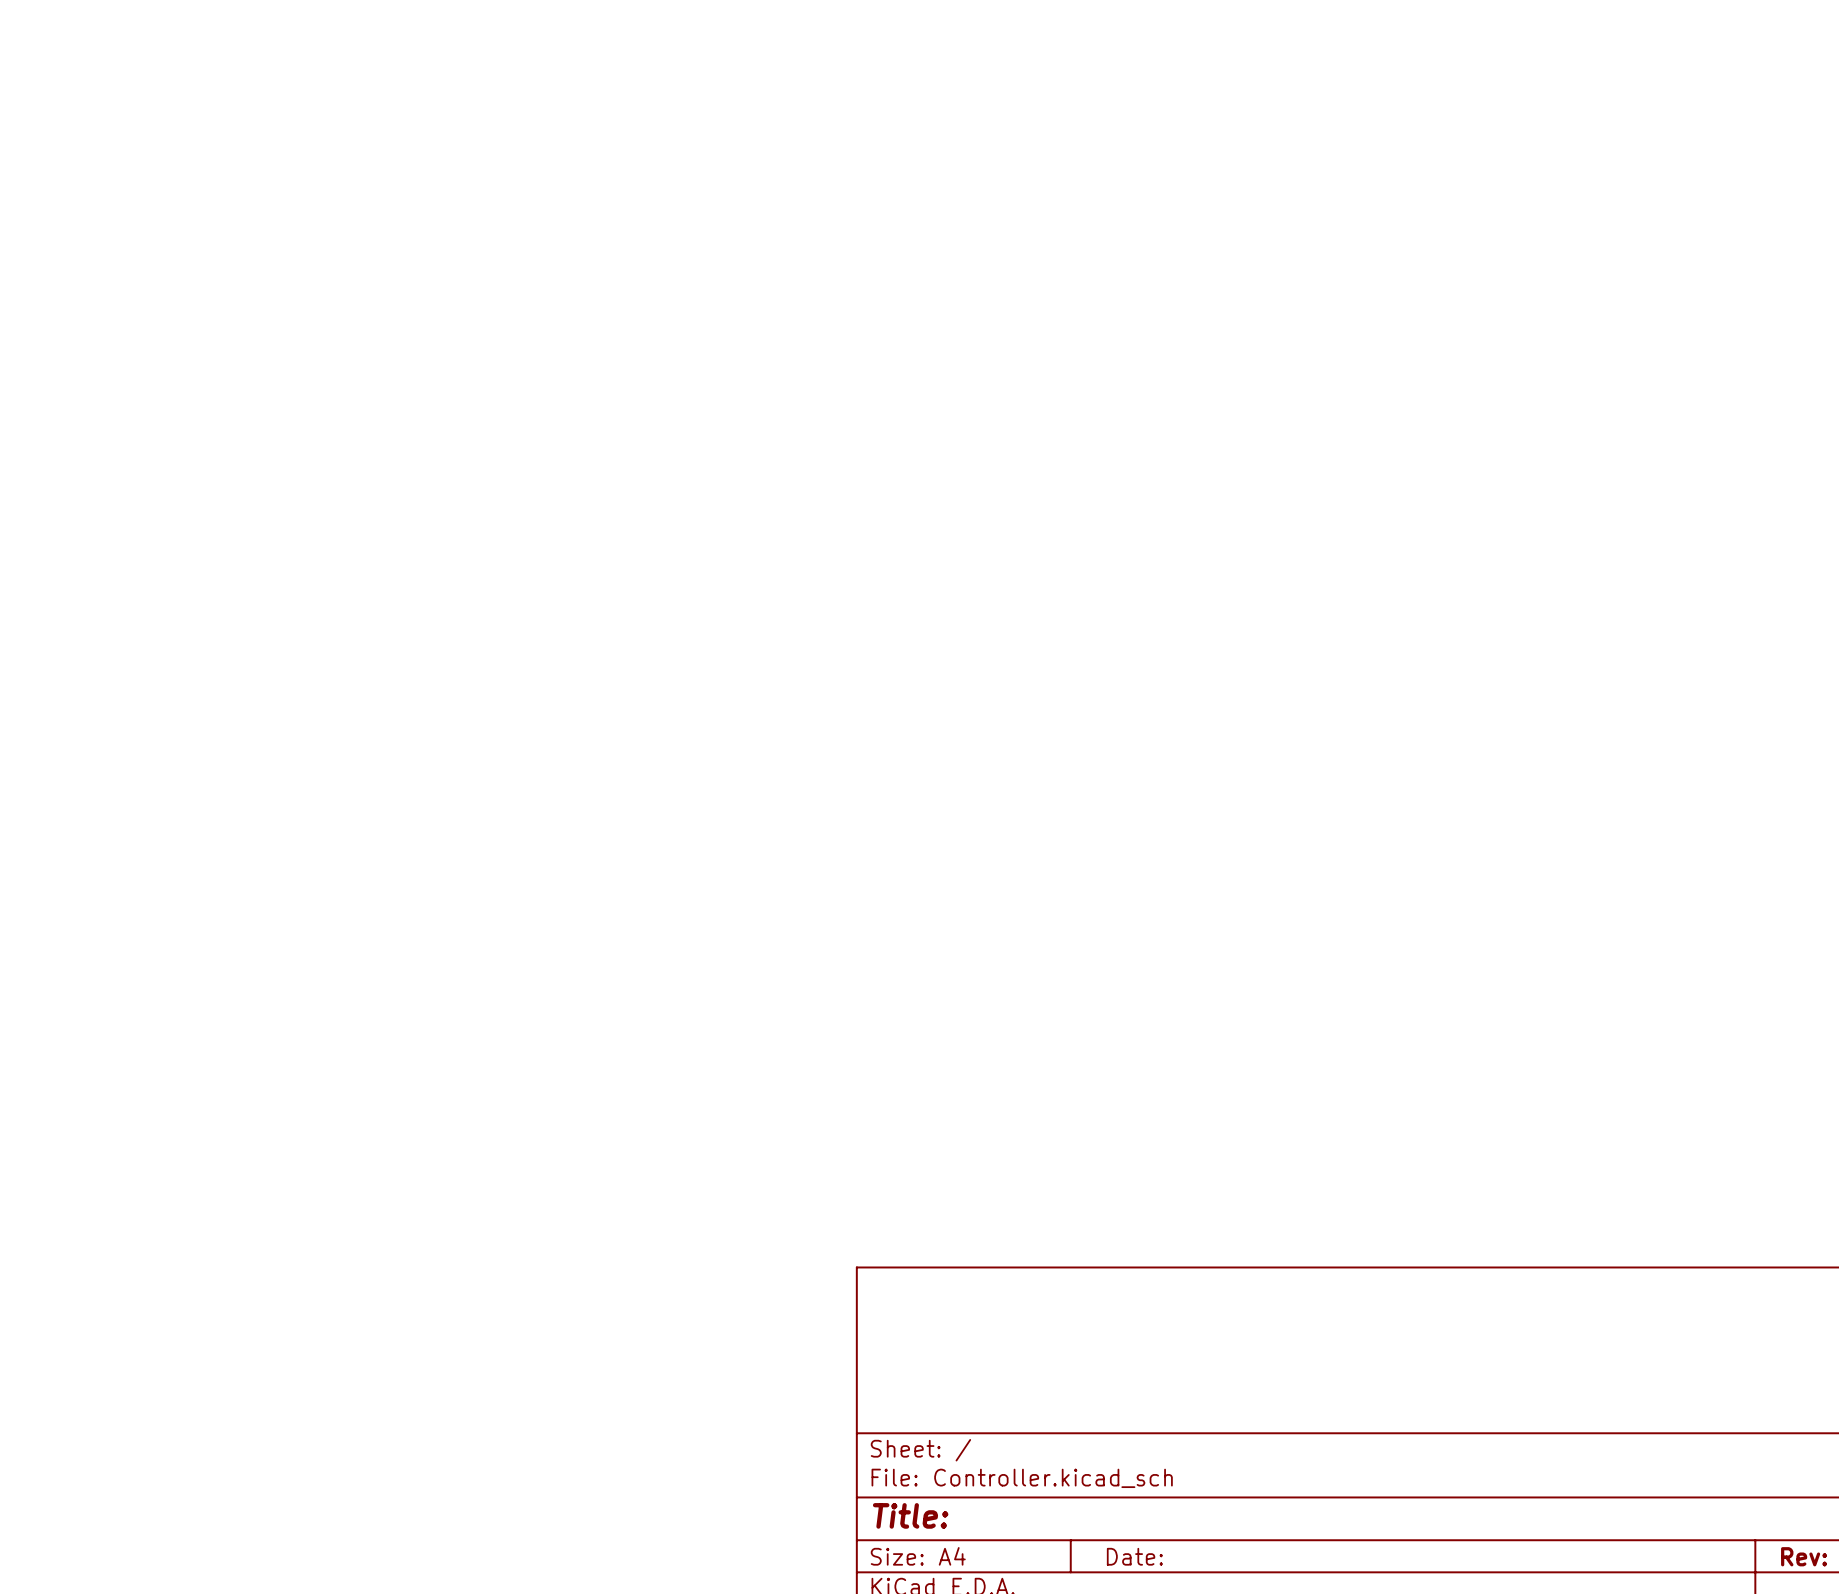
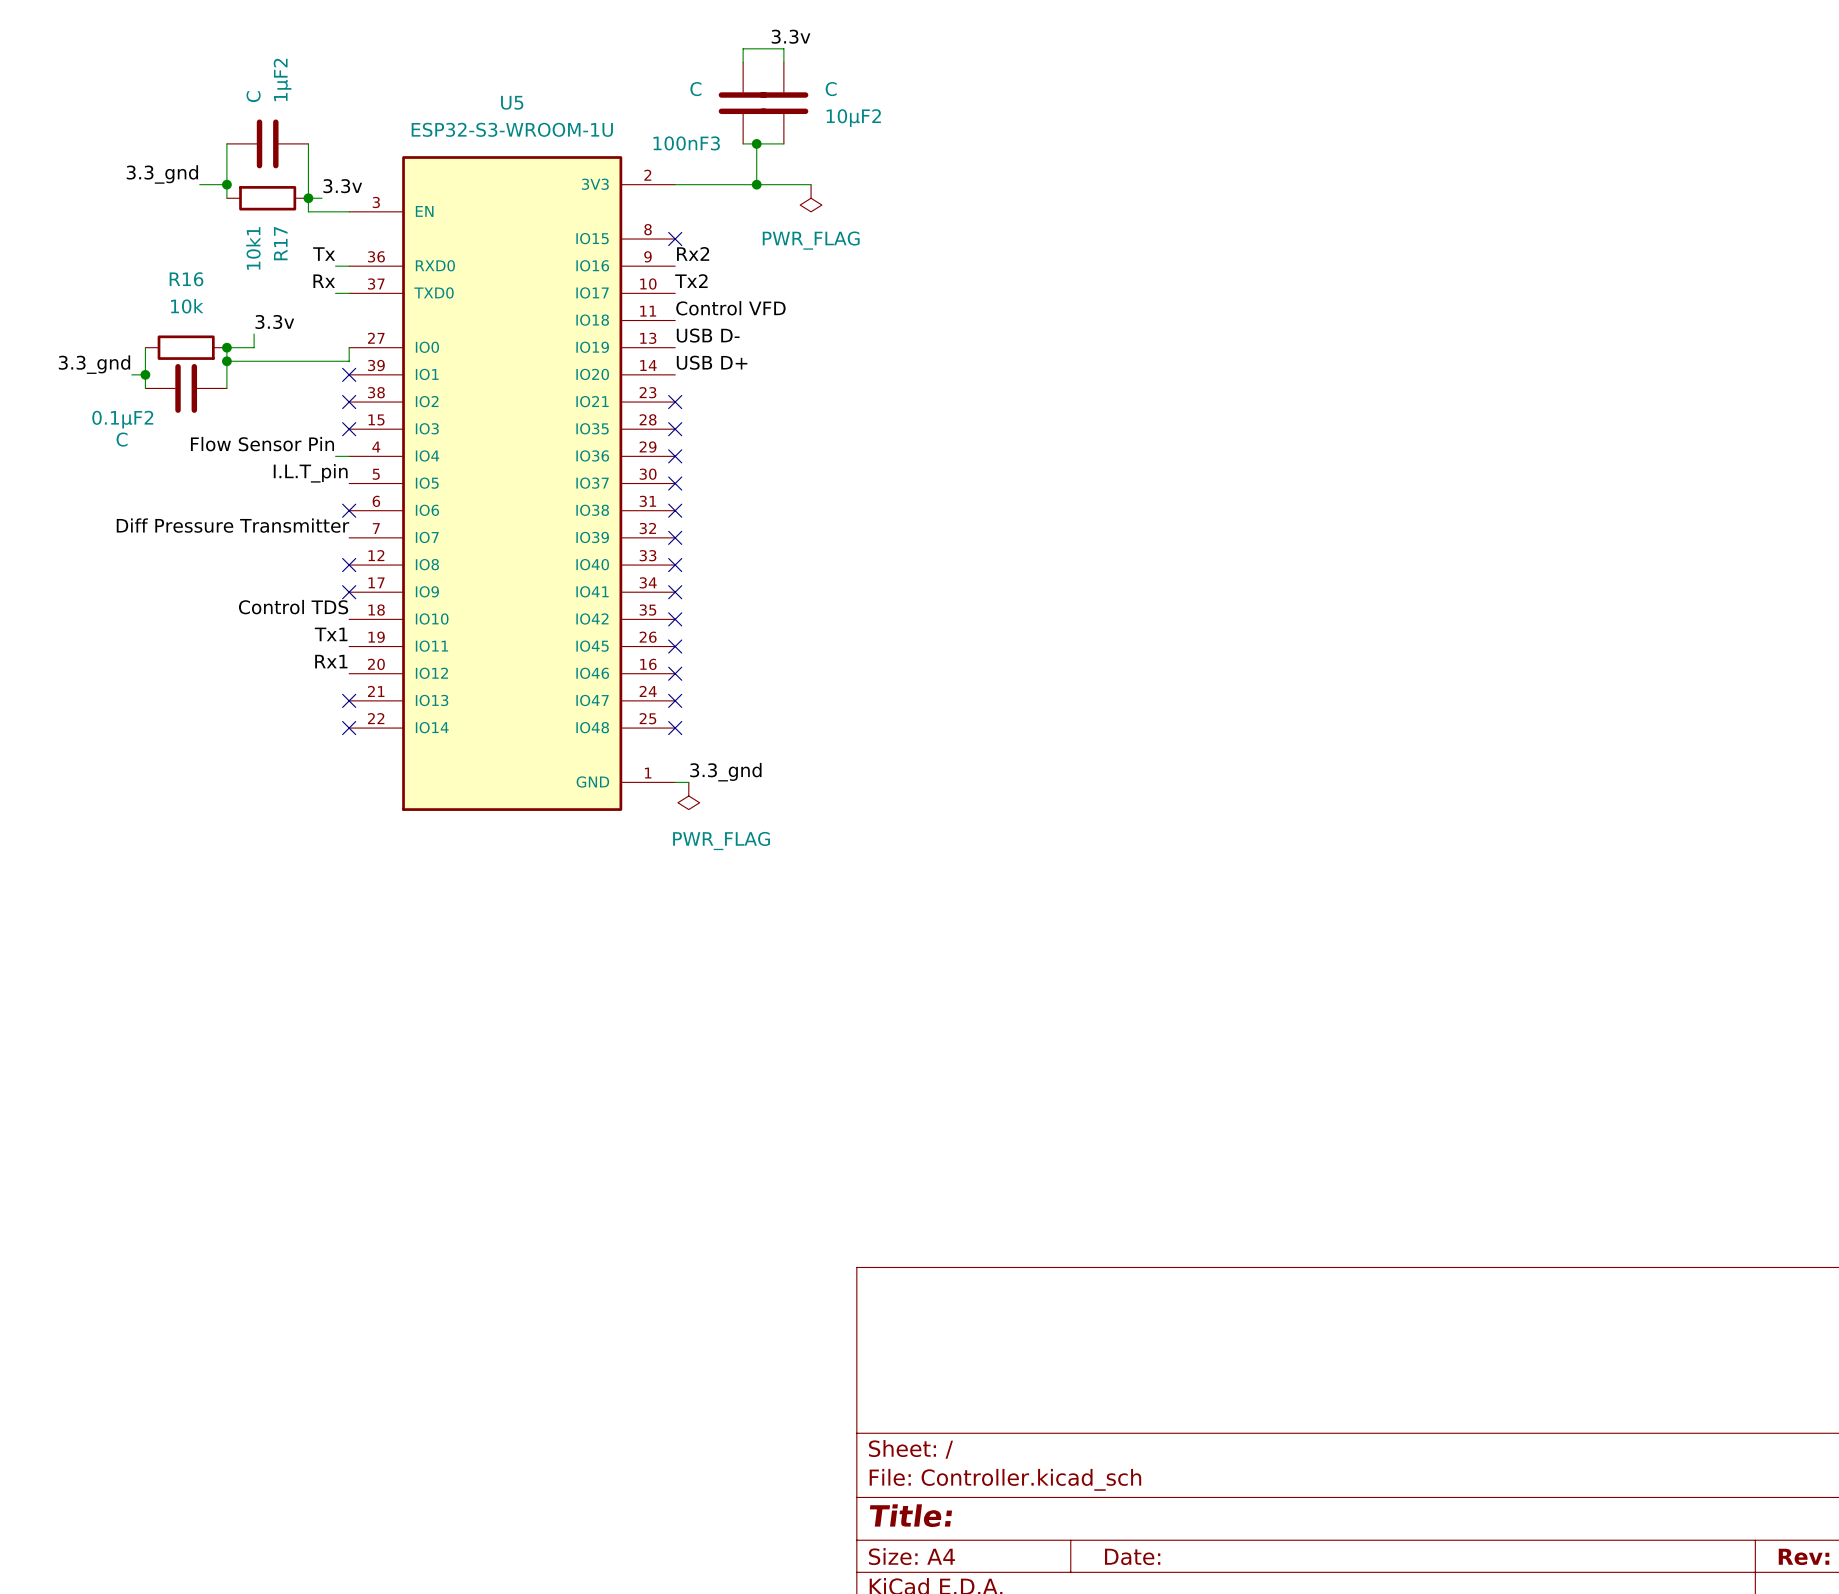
label: none -> 3.3v (791, 36)
wire: none -> (743, 62) (743, 48) (783, 48) (783, 62)
100nF3: none -> C (743, 103)
10μF2: none -> C (783, 103)
wire: none -> (226, 143) (226, 198)
1μF2: none -> C (267, 143)
wire: none -> (308, 143) (308, 211) (349, 211)
wire: none -> (743, 143) (783, 143)
wire: none -> (756, 143) (756, 184)
junction: none -> (756, 143)
label: none -> 3.3_gnd (162, 174)
wire: none -> (199, 184) (226, 184)
junction: none -> (226, 184)
wire: none -> (675, 184) (811, 184)
junction: none -> (756, 184)
label: none -> 3.3v (342, 186)
R17: none -> 10k1 (267, 198)
wire: none -> (308, 198) (322, 198)
junction: none -> (308, 198)
power symbol: none -> PWR_FLAG (811, 198)
no-connect mark: none -> (675, 239)
label: none -> Tx (324, 254)
label: none -> Rx2 (693, 253)
wire: none -> (335, 266) (349, 266)
label: none -> Rx (324, 281)
label: none -> Tx2 (691, 281)
wire: none -> (335, 293) (349, 293)
label: none -> Control VFD (730, 308)
label: none -> 3.3v (274, 321)
wire: none -> (254, 334) (254, 347) (226, 347) (226, 388)
label: none -> USB D- (708, 335)
wire: none -> (145, 347) (145, 388)
R16: none -> 10k (186, 347)
junction: none -> (226, 347)
wire: none -> (349, 347) (349, 361) (226, 361)
junction: none -> (226, 361)
label: none -> USB D+ (712, 362)
label: none -> 3.3_gnd (94, 364)
wire: none -> (131, 374) (145, 374)
junction: none -> (145, 374)
no-connect mark: none -> (349, 374)
0.1µF2: none -> C (186, 388)
no-connect mark: none -> (349, 402)
no-connect mark: none -> (675, 402)
no-connect mark: none -> (349, 429)
no-connect mark: none -> (675, 429)
label: none -> Flow Sensor Pin (262, 444)
wire: none -> (335, 456) (349, 456)
no-connect mark: none -> (675, 456)
label: none -> I.L.T_pin (310, 473)
U5: none -> ESP32-S3-WROOM-1U (512, 483)
no-connect mark: none -> (675, 483)
no-connect mark: none -> (349, 510)
no-connect mark: none -> (675, 510)
label: none -> Diff Pressure Transmitter (232, 525)
no-connect mark: none -> (675, 537)
no-connect mark: none -> (349, 565)
no-connect mark: none -> (675, 565)
no-connect mark: none -> (349, 592)
no-connect mark: none -> (675, 592)
label: none -> Control TDS (293, 607)
no-connect mark: none -> (675, 619)
label: none -> Tx1 (331, 634)
no-connect mark: none -> (675, 646)
label: none -> Rx1 (331, 661)
no-connect mark: none -> (675, 673)
no-connect mark: none -> (349, 700)
no-connect mark: none -> (675, 700)
no-connect mark: none -> (349, 728)
no-connect mark: none -> (675, 728)
label: none -> 3.3_gnd (725, 772)
wire: none -> (675, 782) (688, 782)
power symbol: none -> PWR_FLAG (688, 795)

